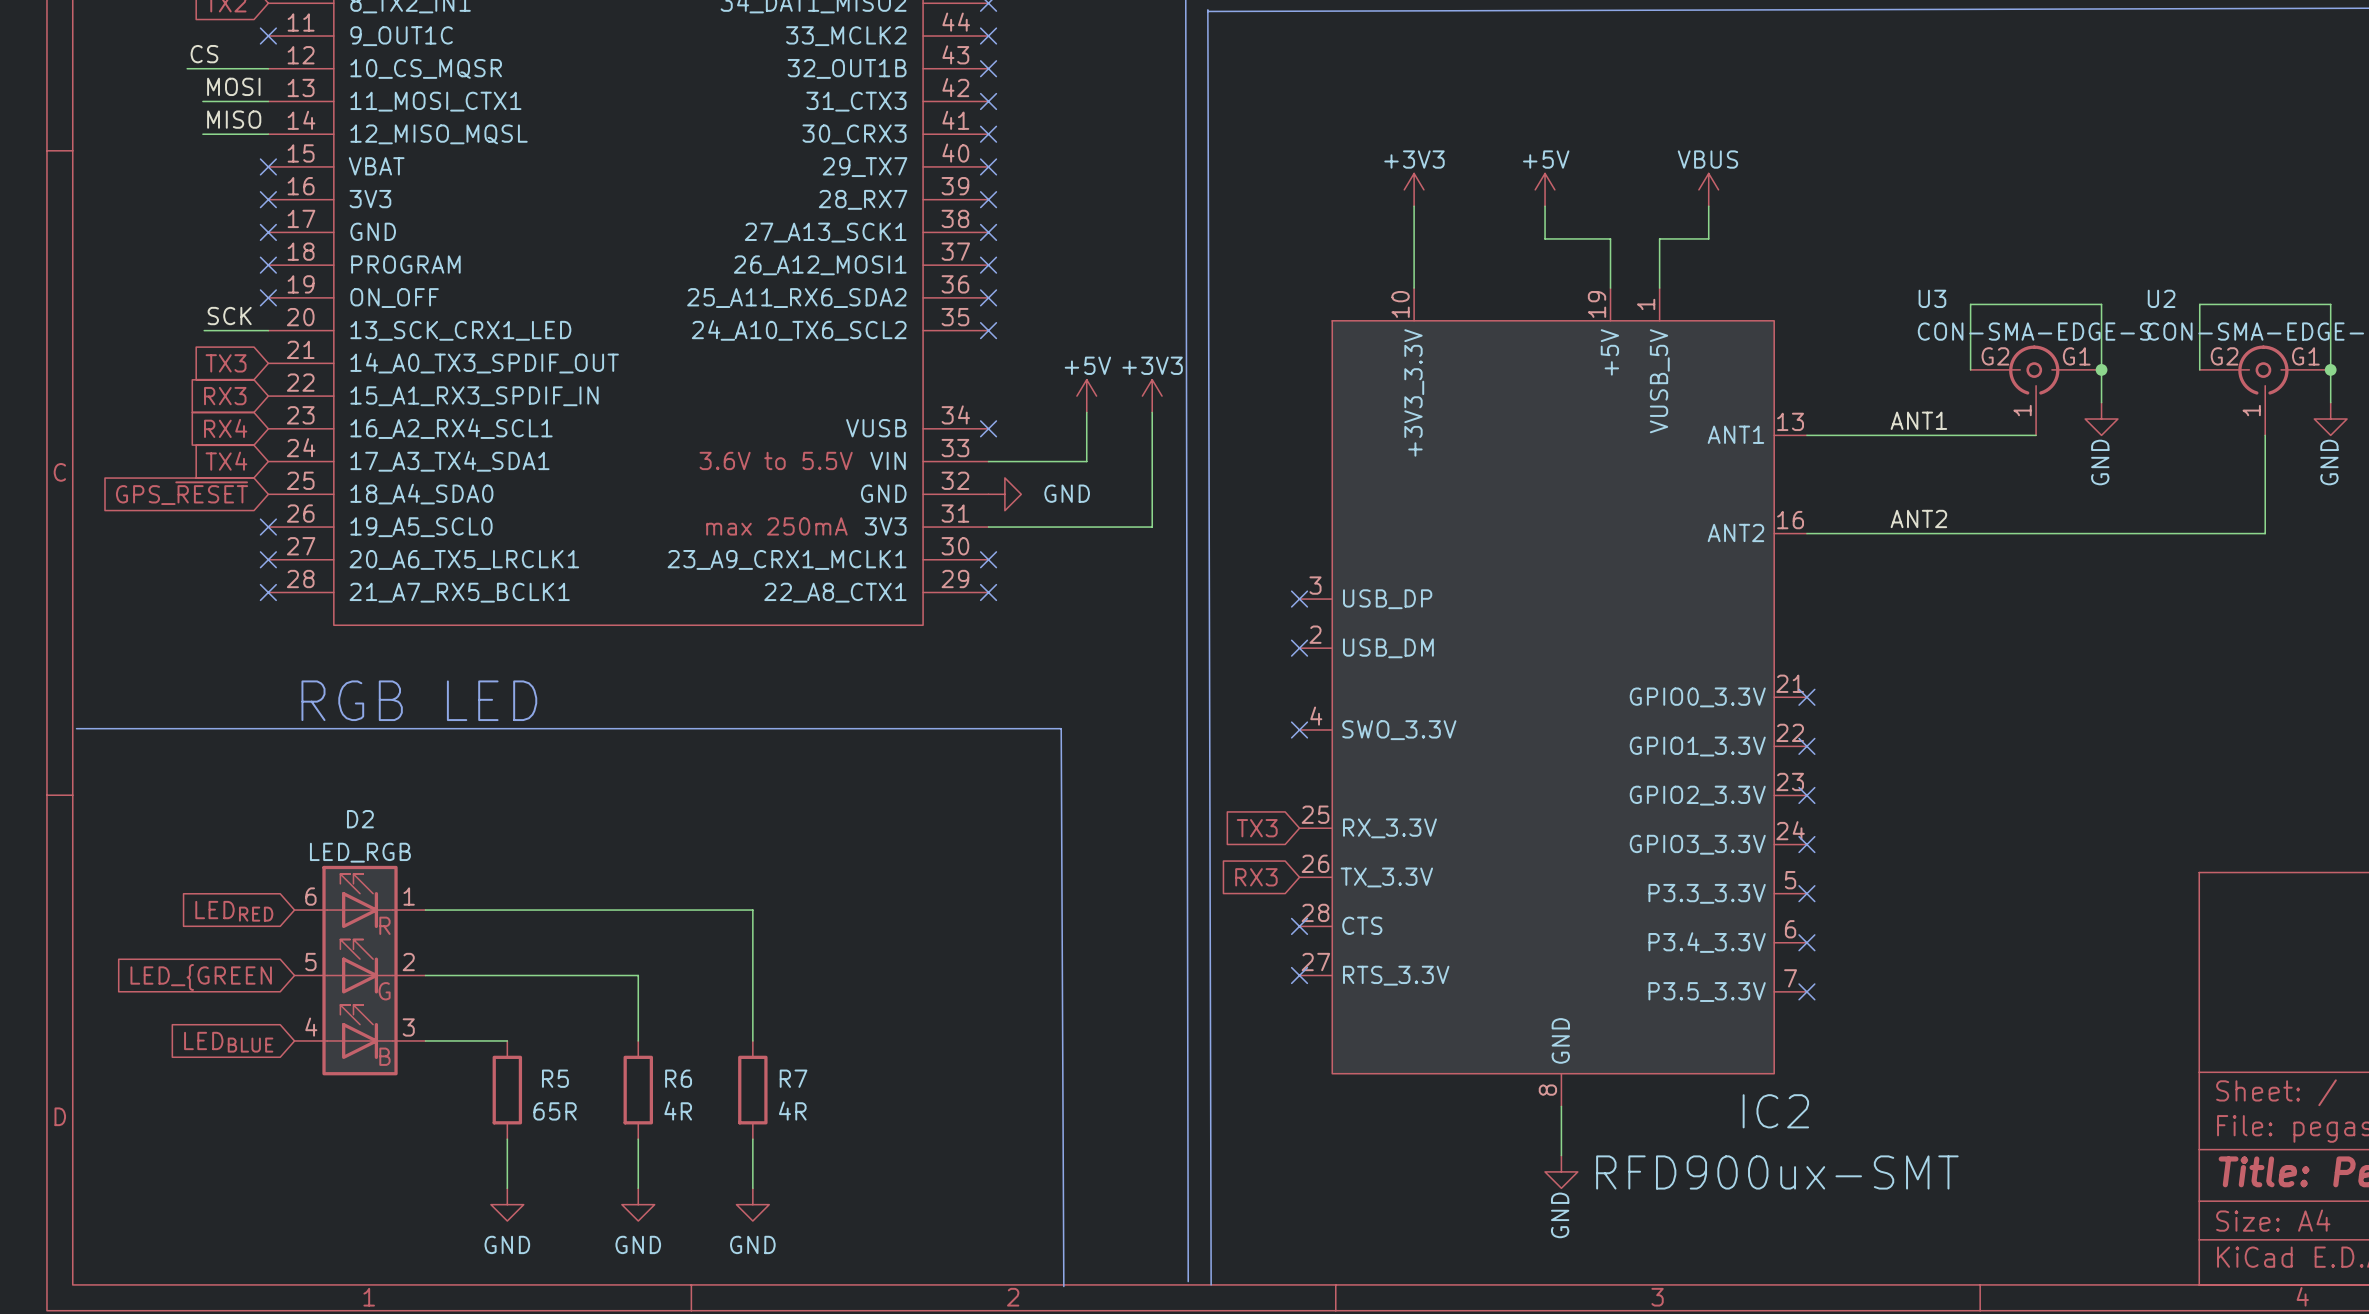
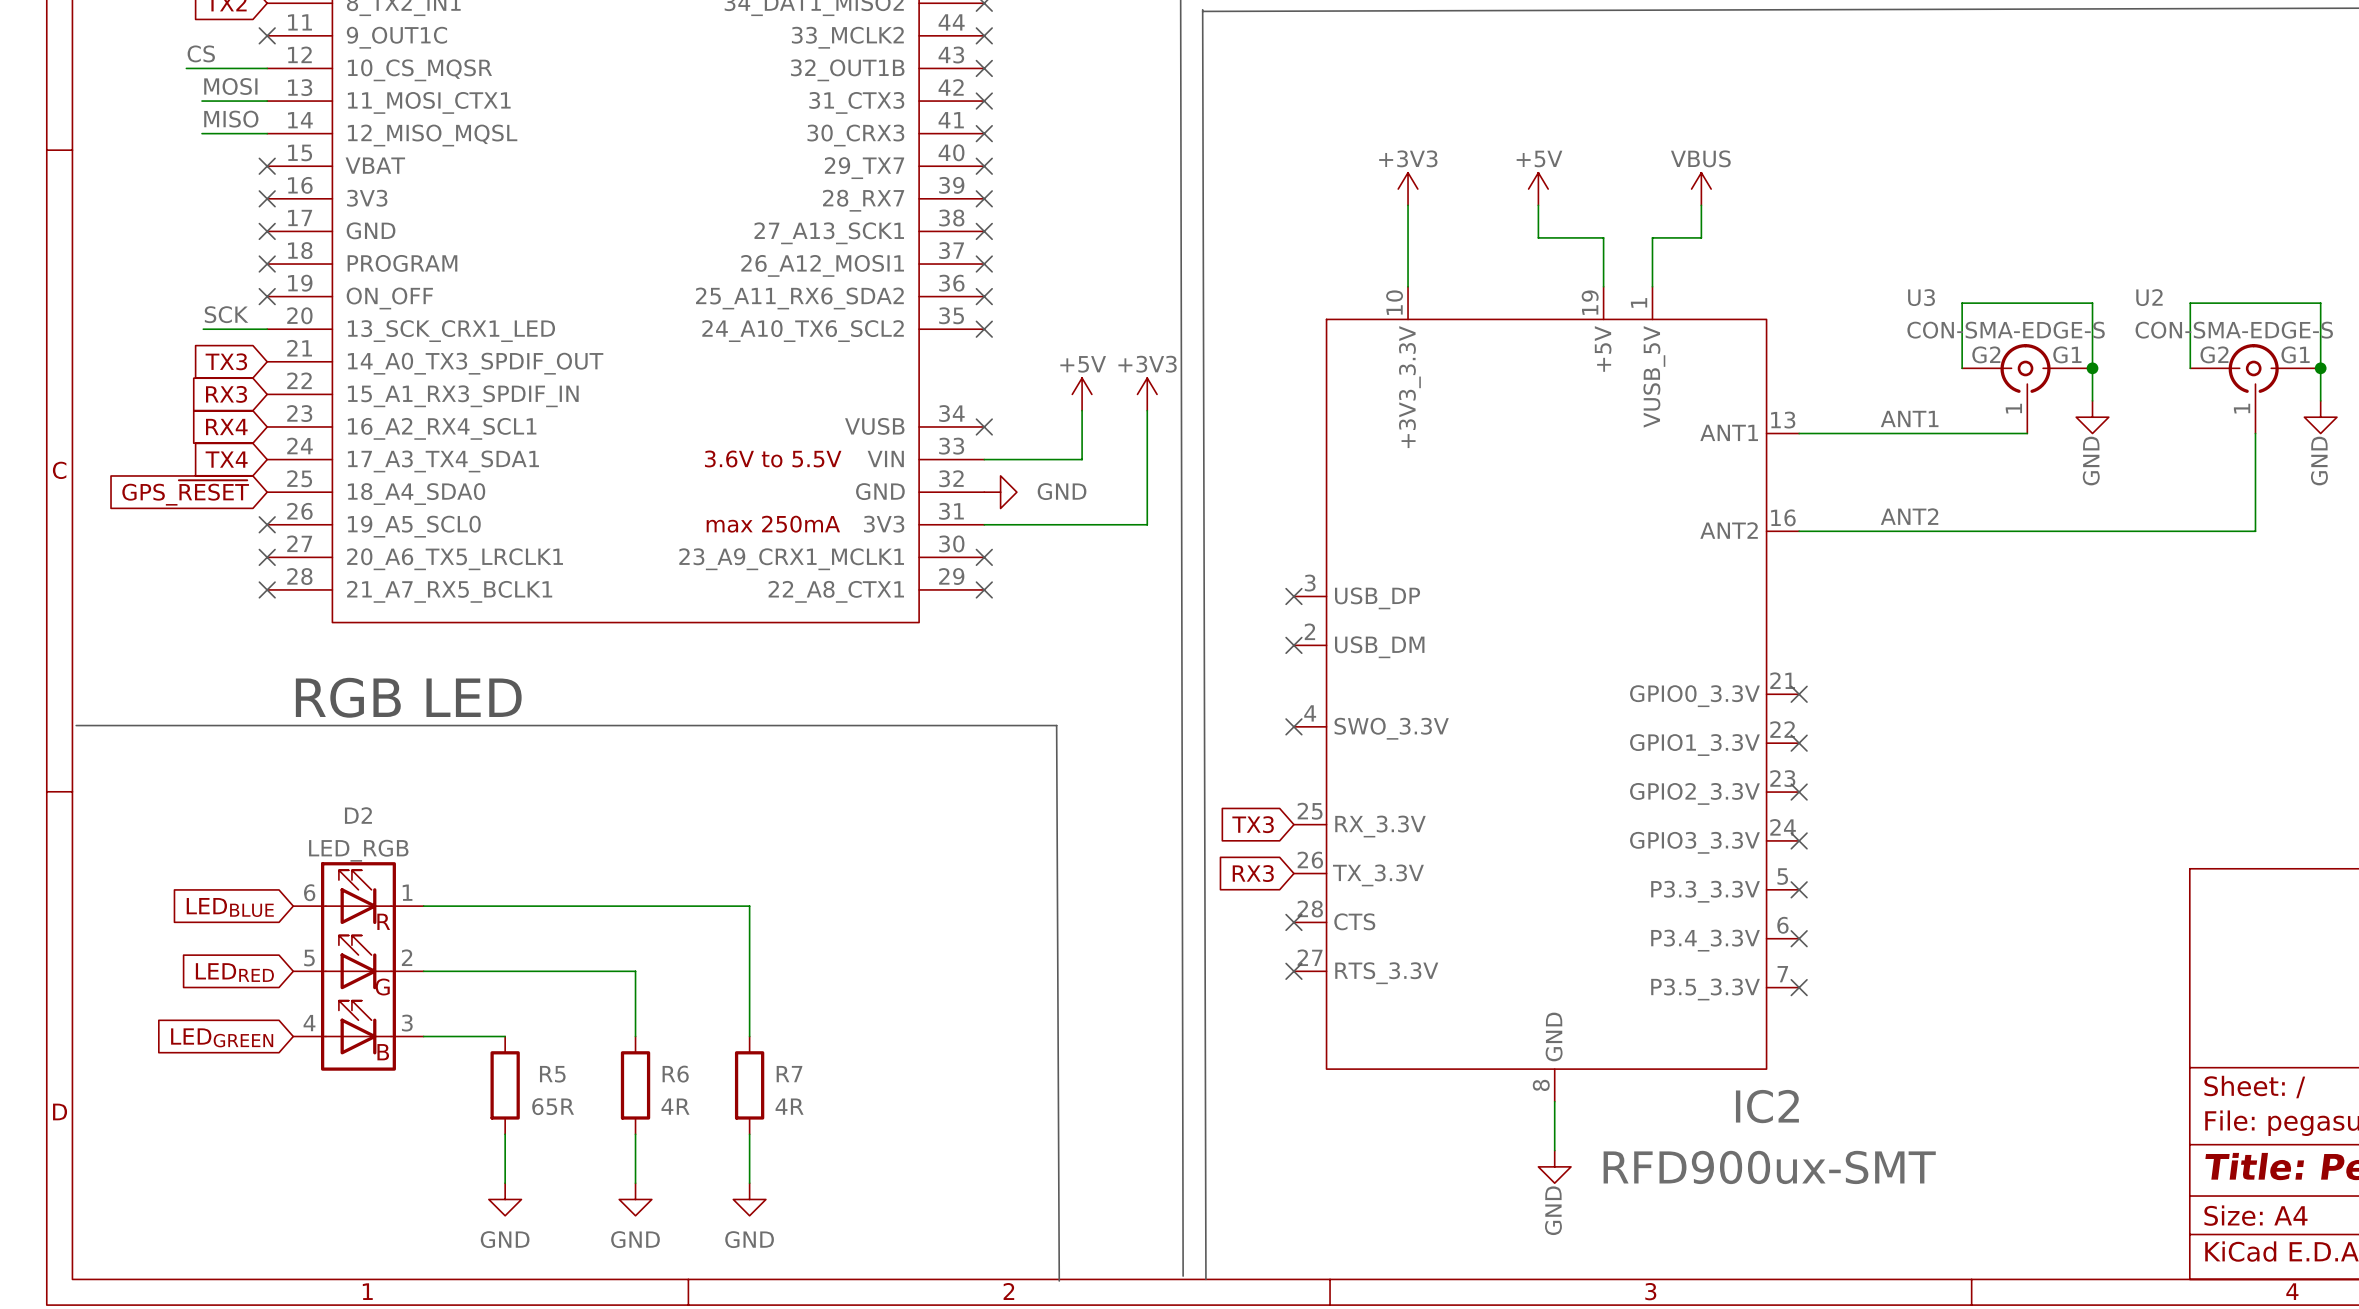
global label: LEDRED (234, 911) -> LEDBLUE (230, 907)
global label: LED_{GREEN (201, 977) -> LEDRED (234, 972)
global label: LEDBLUE (228, 1042) -> LEDGREEN (222, 1037)

